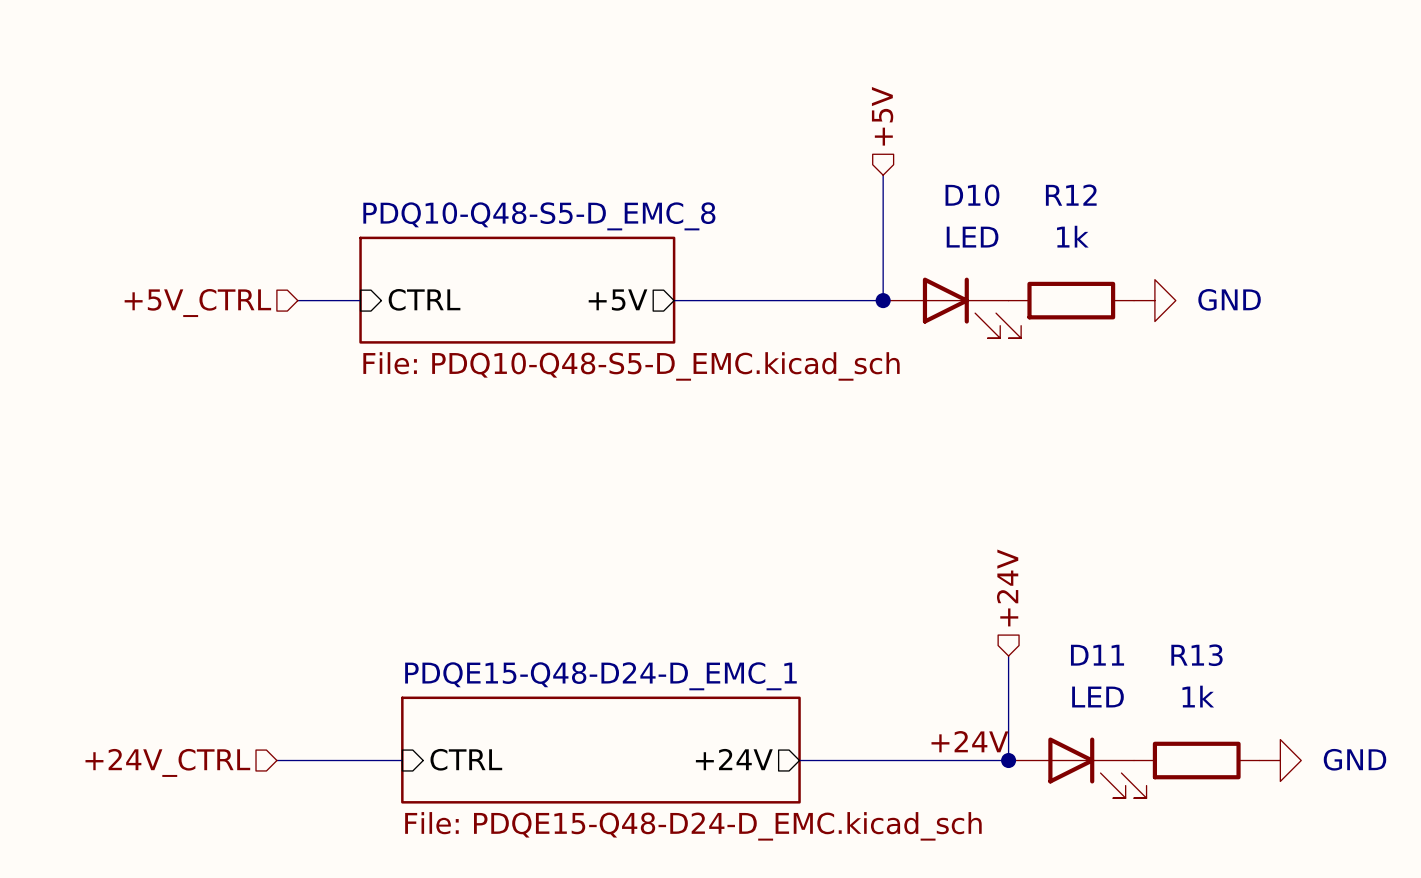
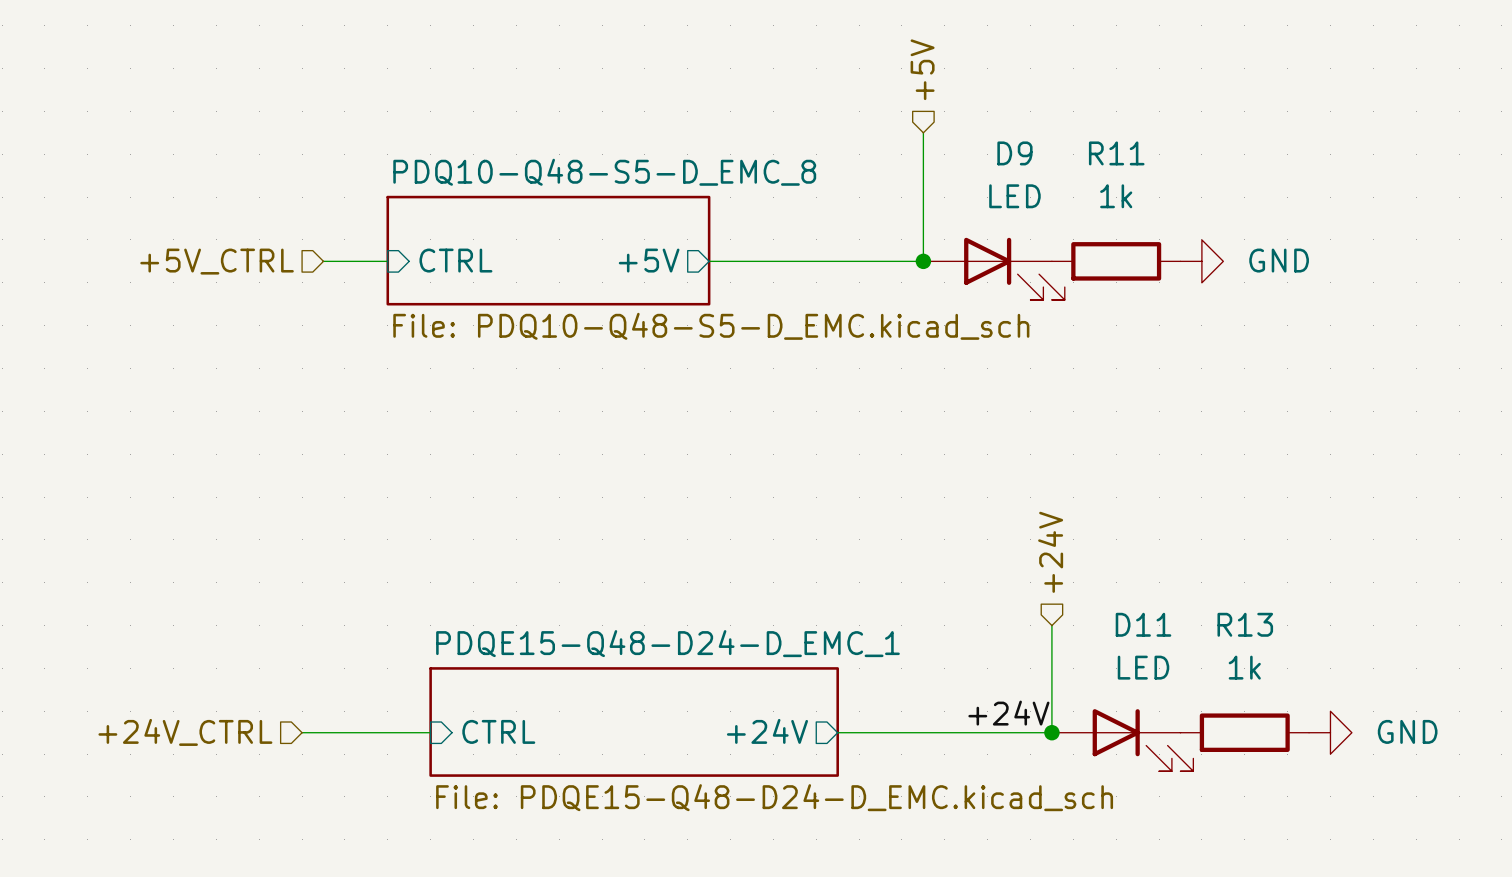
D10 name: D10 (972, 195) -> D9 (1014, 153)
R12 name: R12 (1071, 195) -> R11 (1116, 153)

